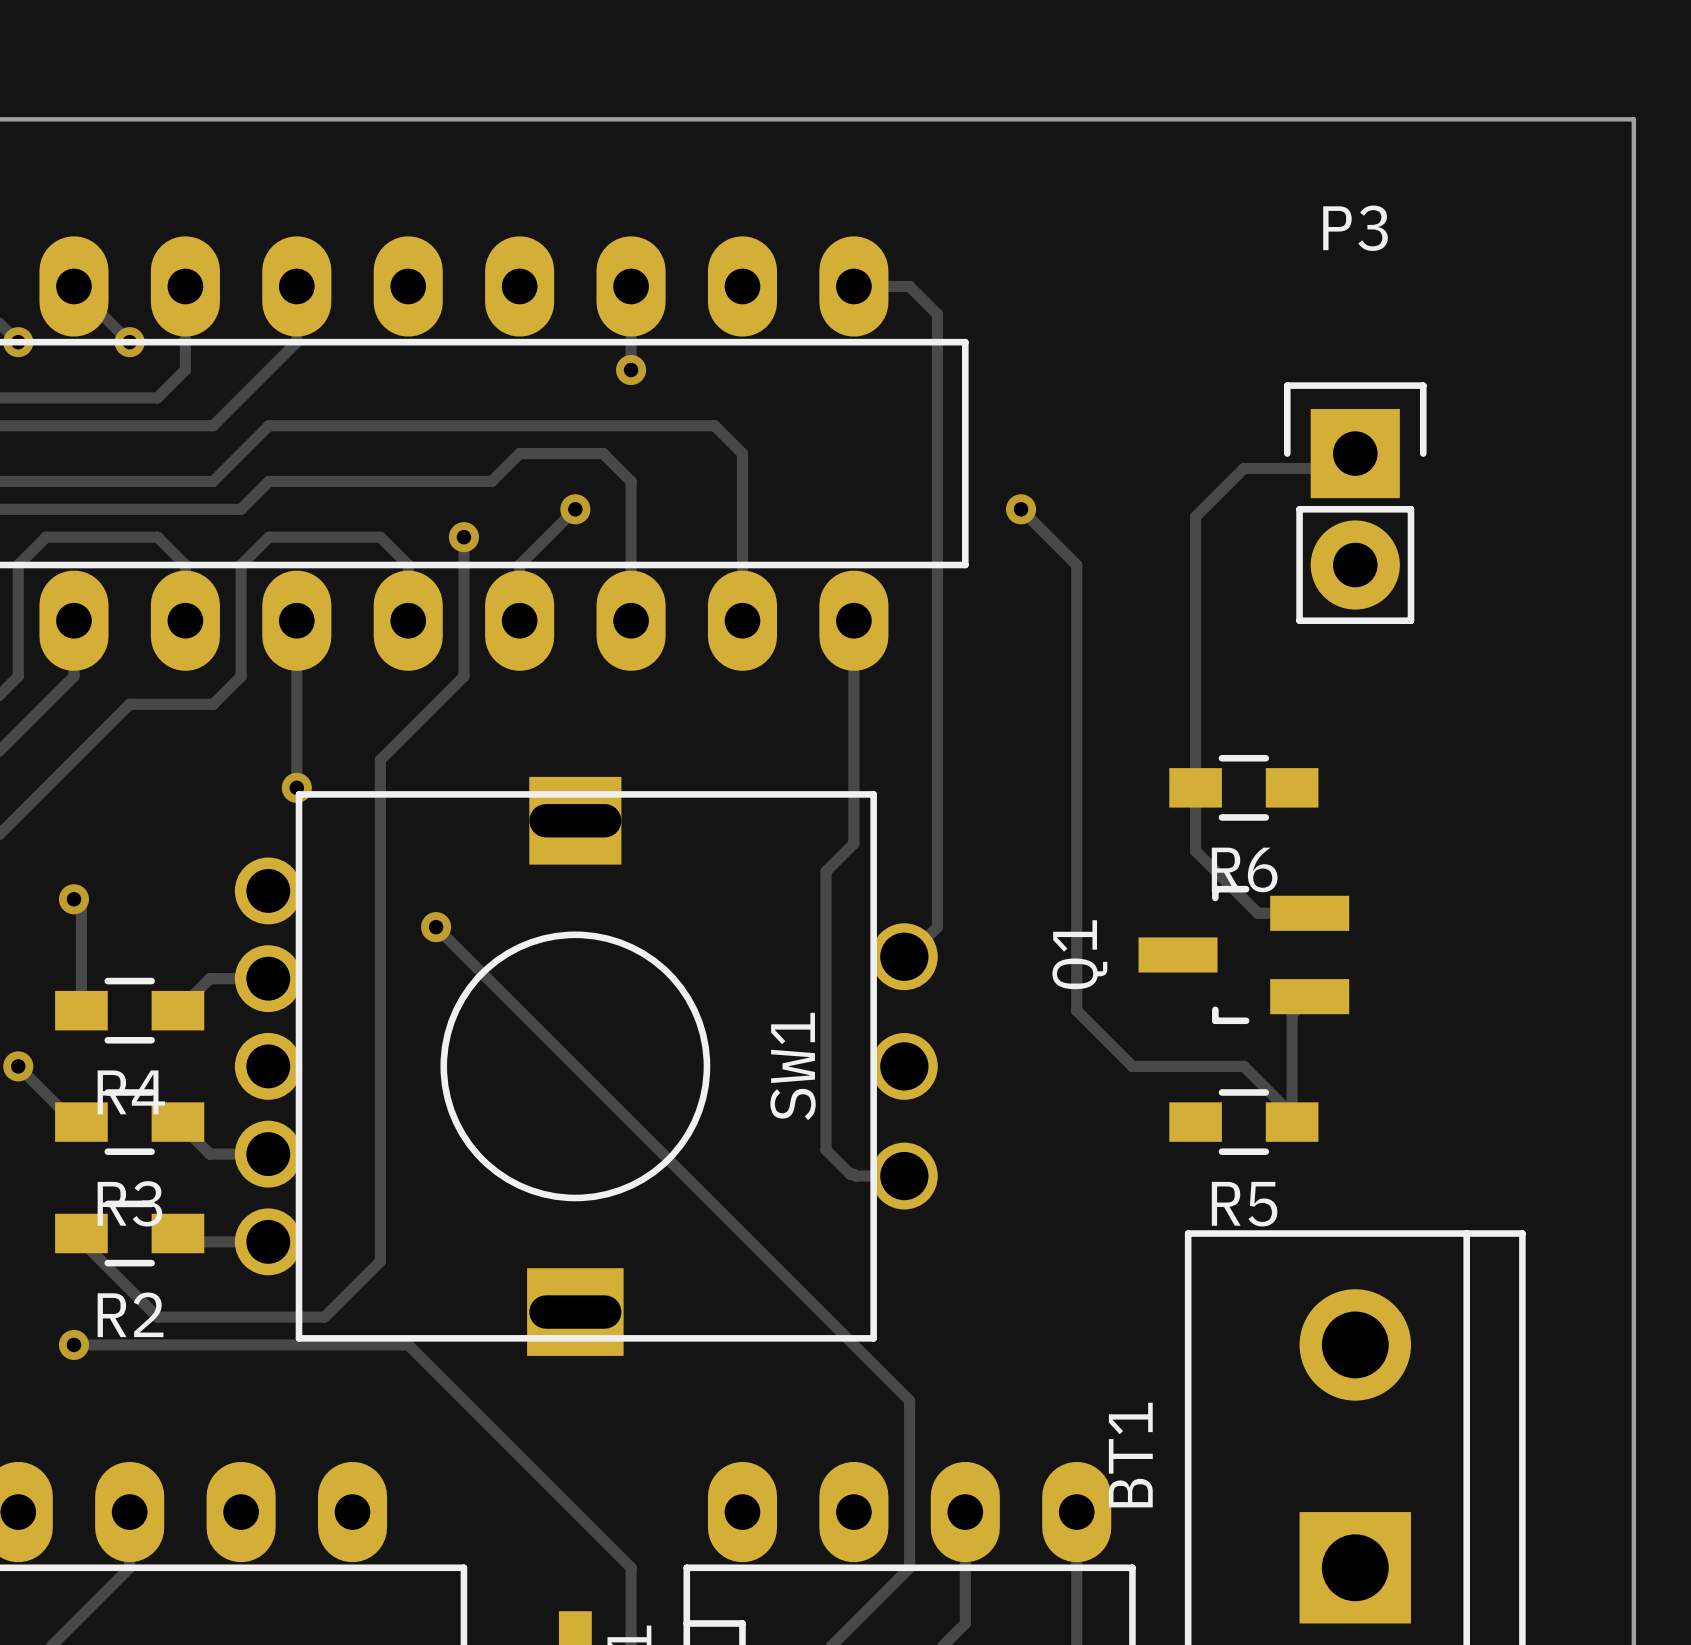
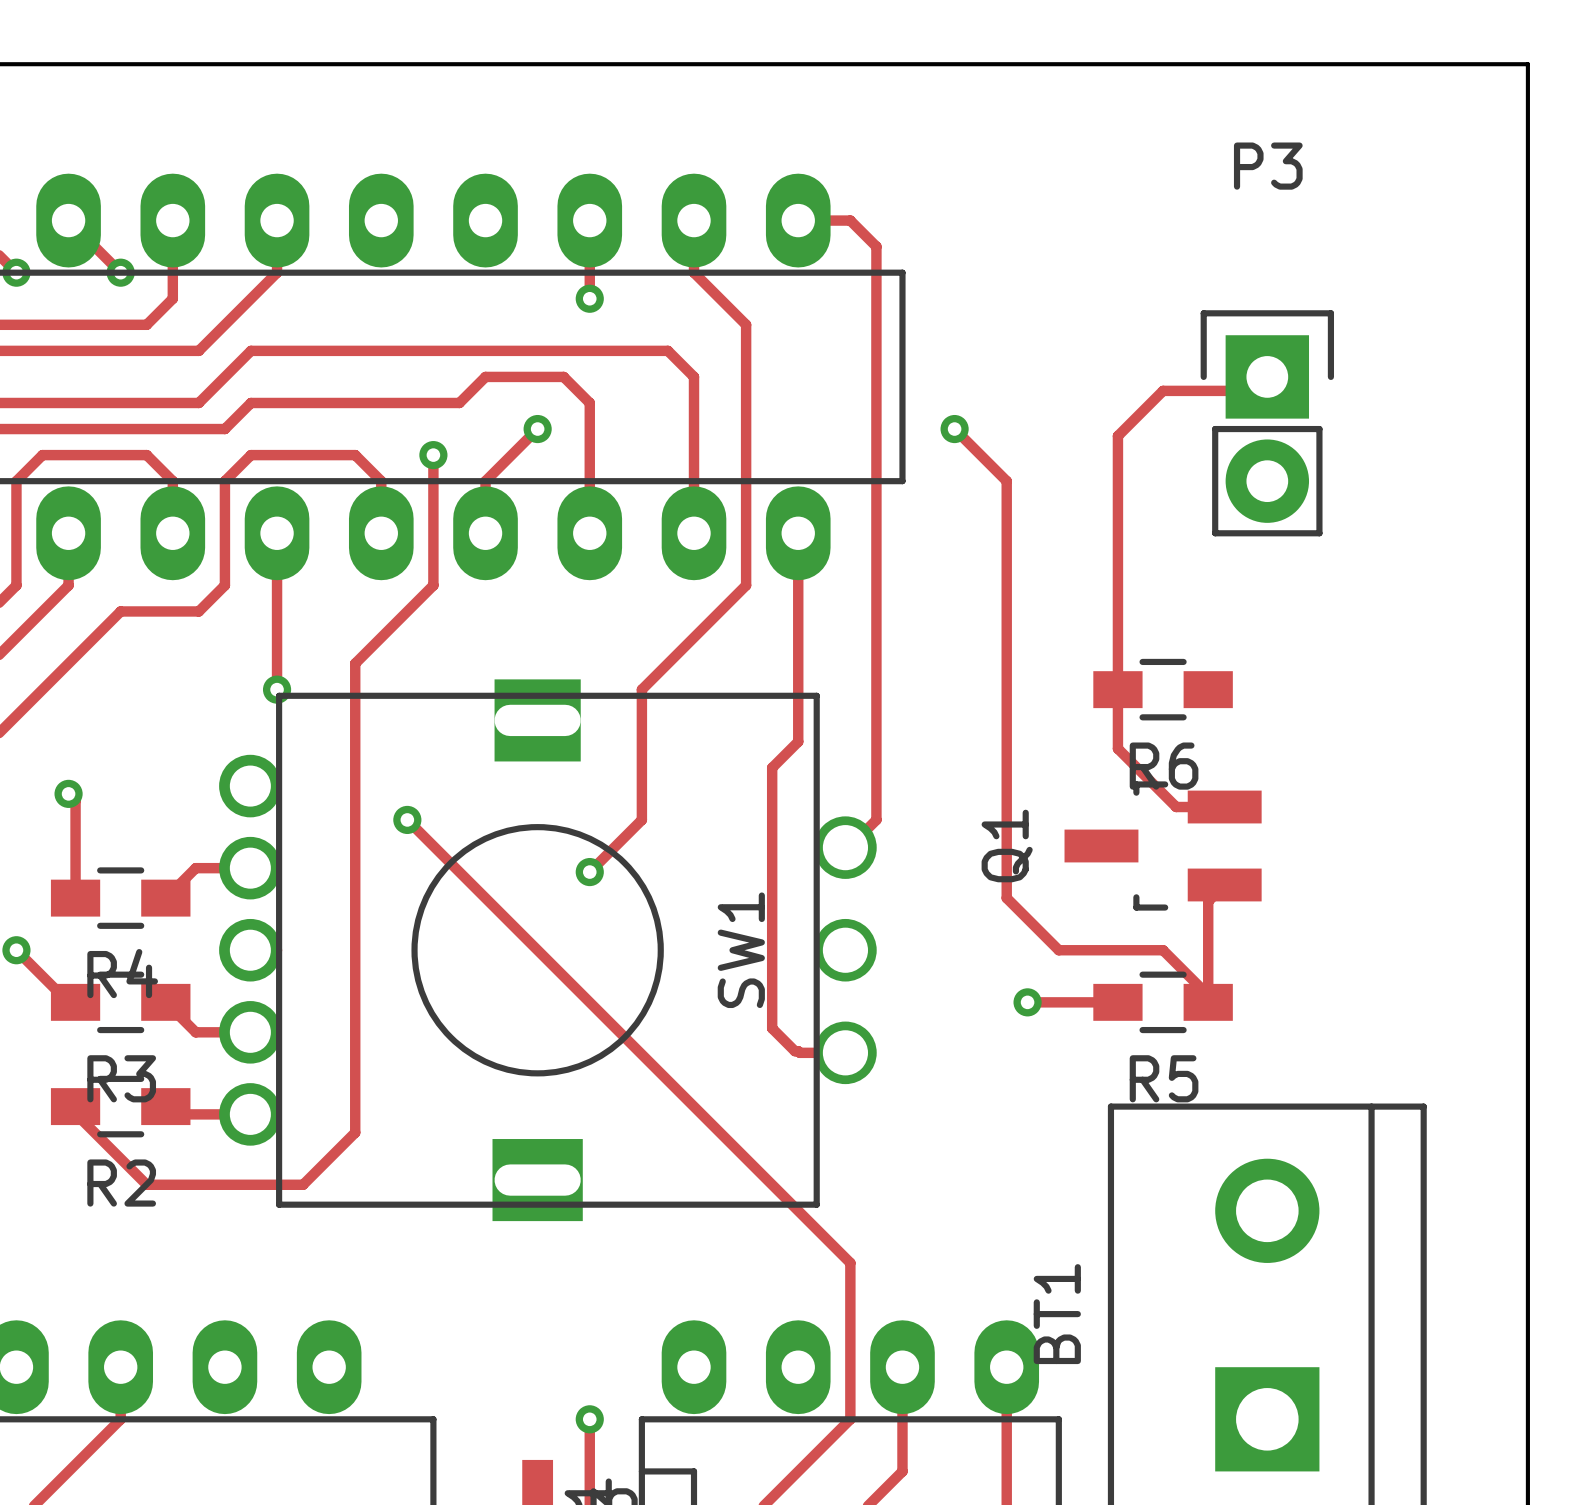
track: none -> (694, 220) (694, 272) (746, 324) (746, 585) (641, 689) (641, 819) (589, 872)
via: none -> (589, 872)
track: none -> (1027, 1002) (1117, 1002)
via: none -> (1027, 1002)
track: (73, 1344) (408, 1344) (631, 1567) -> none
via: (73, 1344) -> none
via: none -> (589, 1419)

